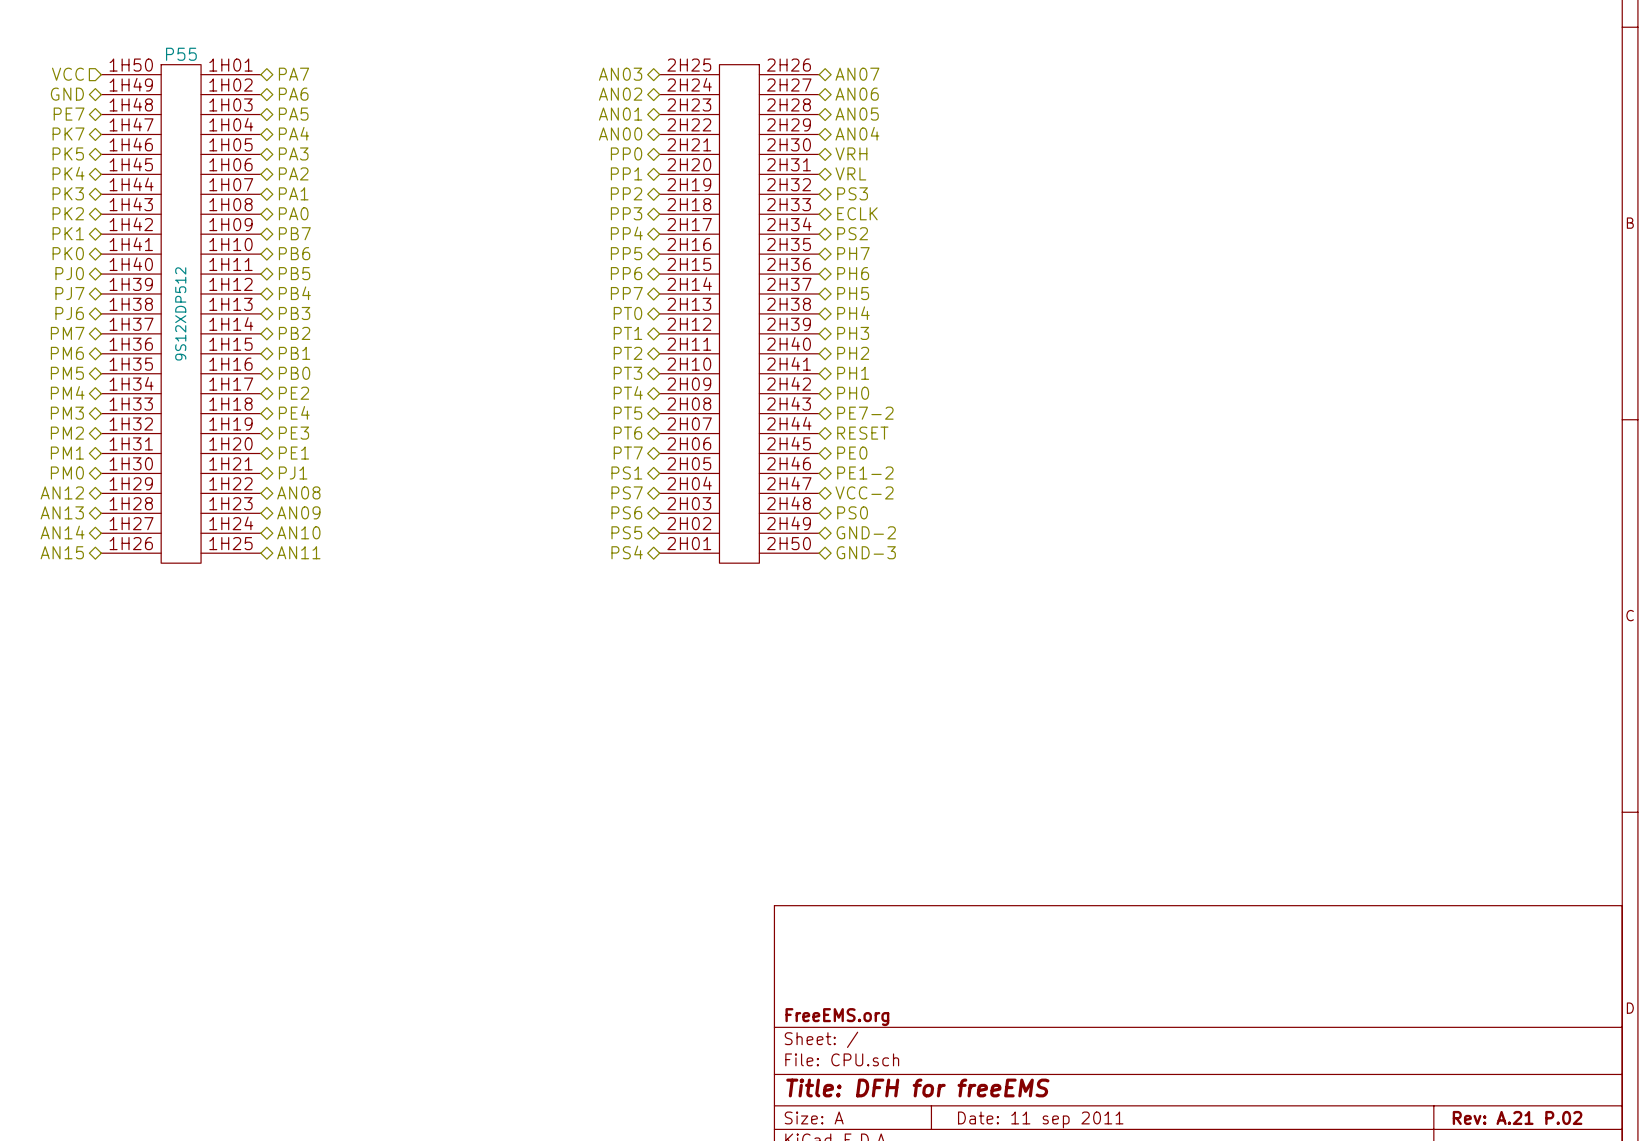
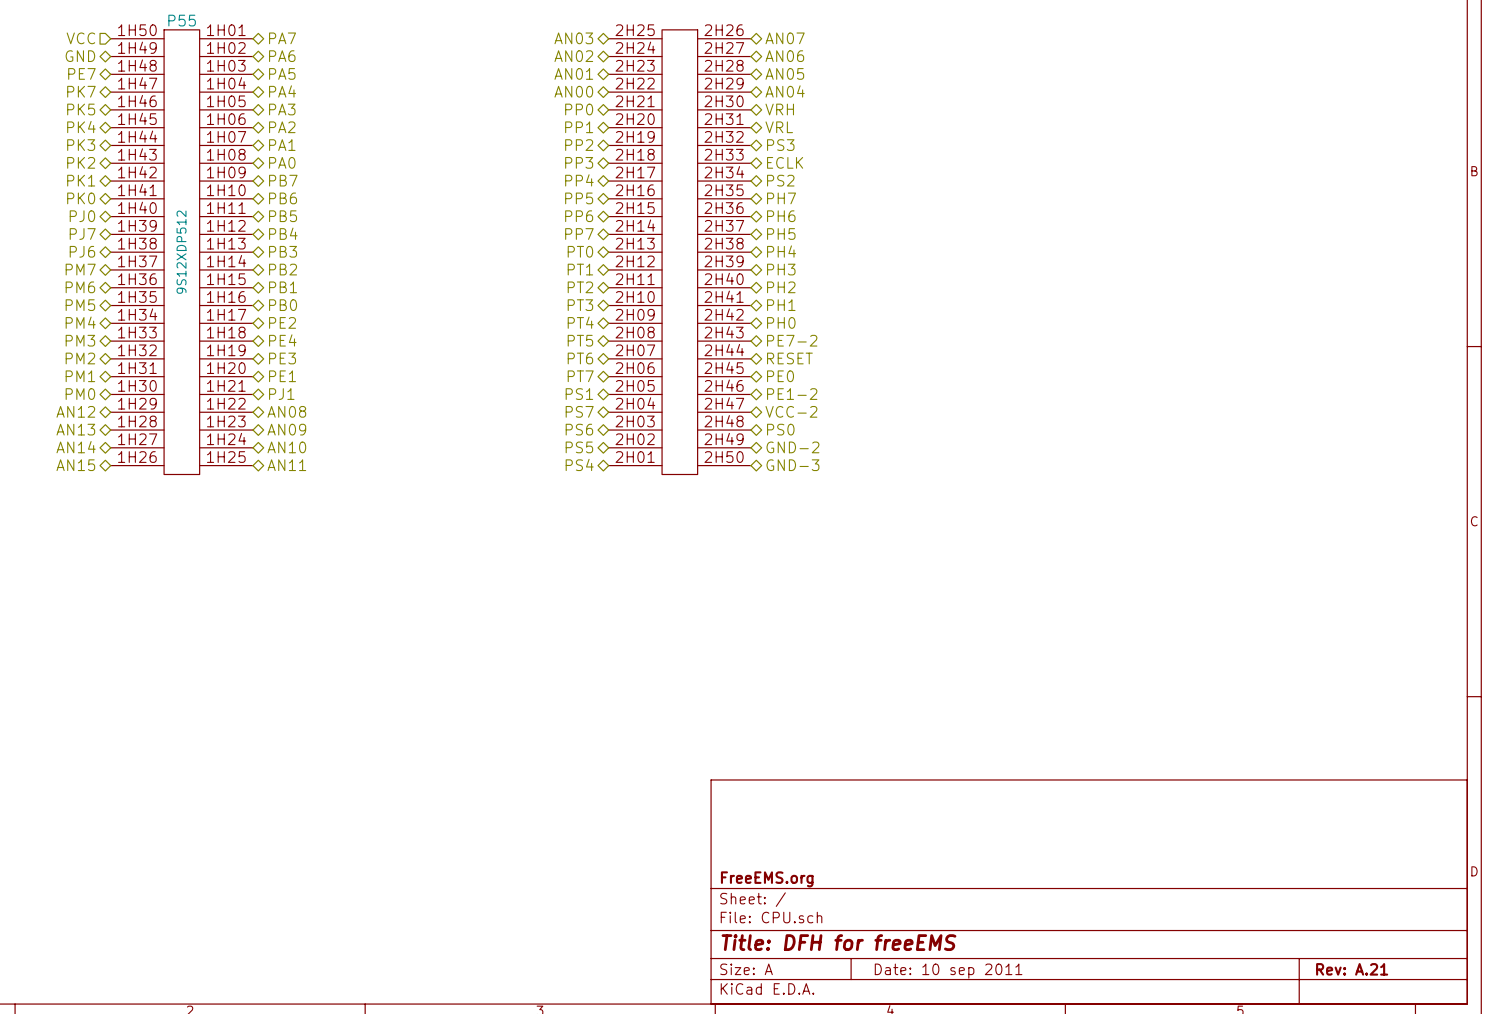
title block: Rev: A.21 P.02 (1517, 1117) -> Rev: A.21 (1352, 969)
title block: Date: 11 sep 2011 (1040, 1119) -> Date: 10 sep 2011 (948, 971)

